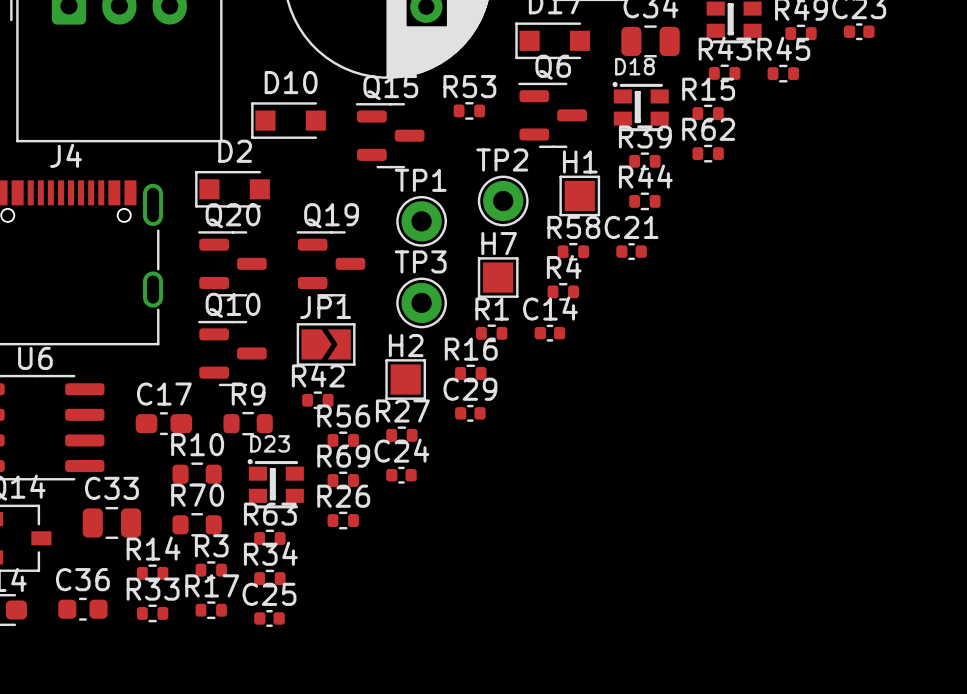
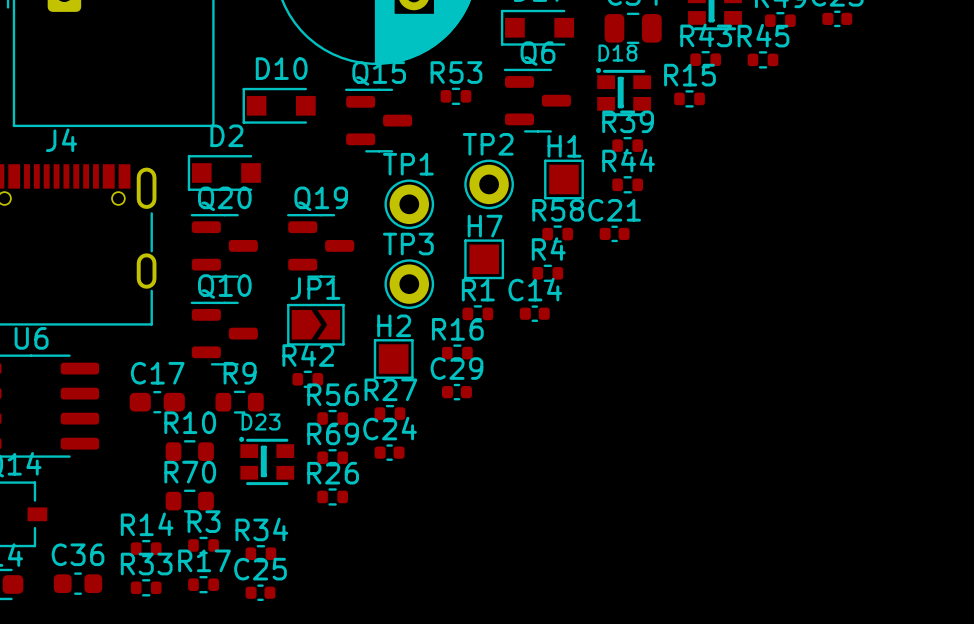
R62: (708, 153) -> none
C33: (111, 522) -> none
R63: (269, 538) -> none

